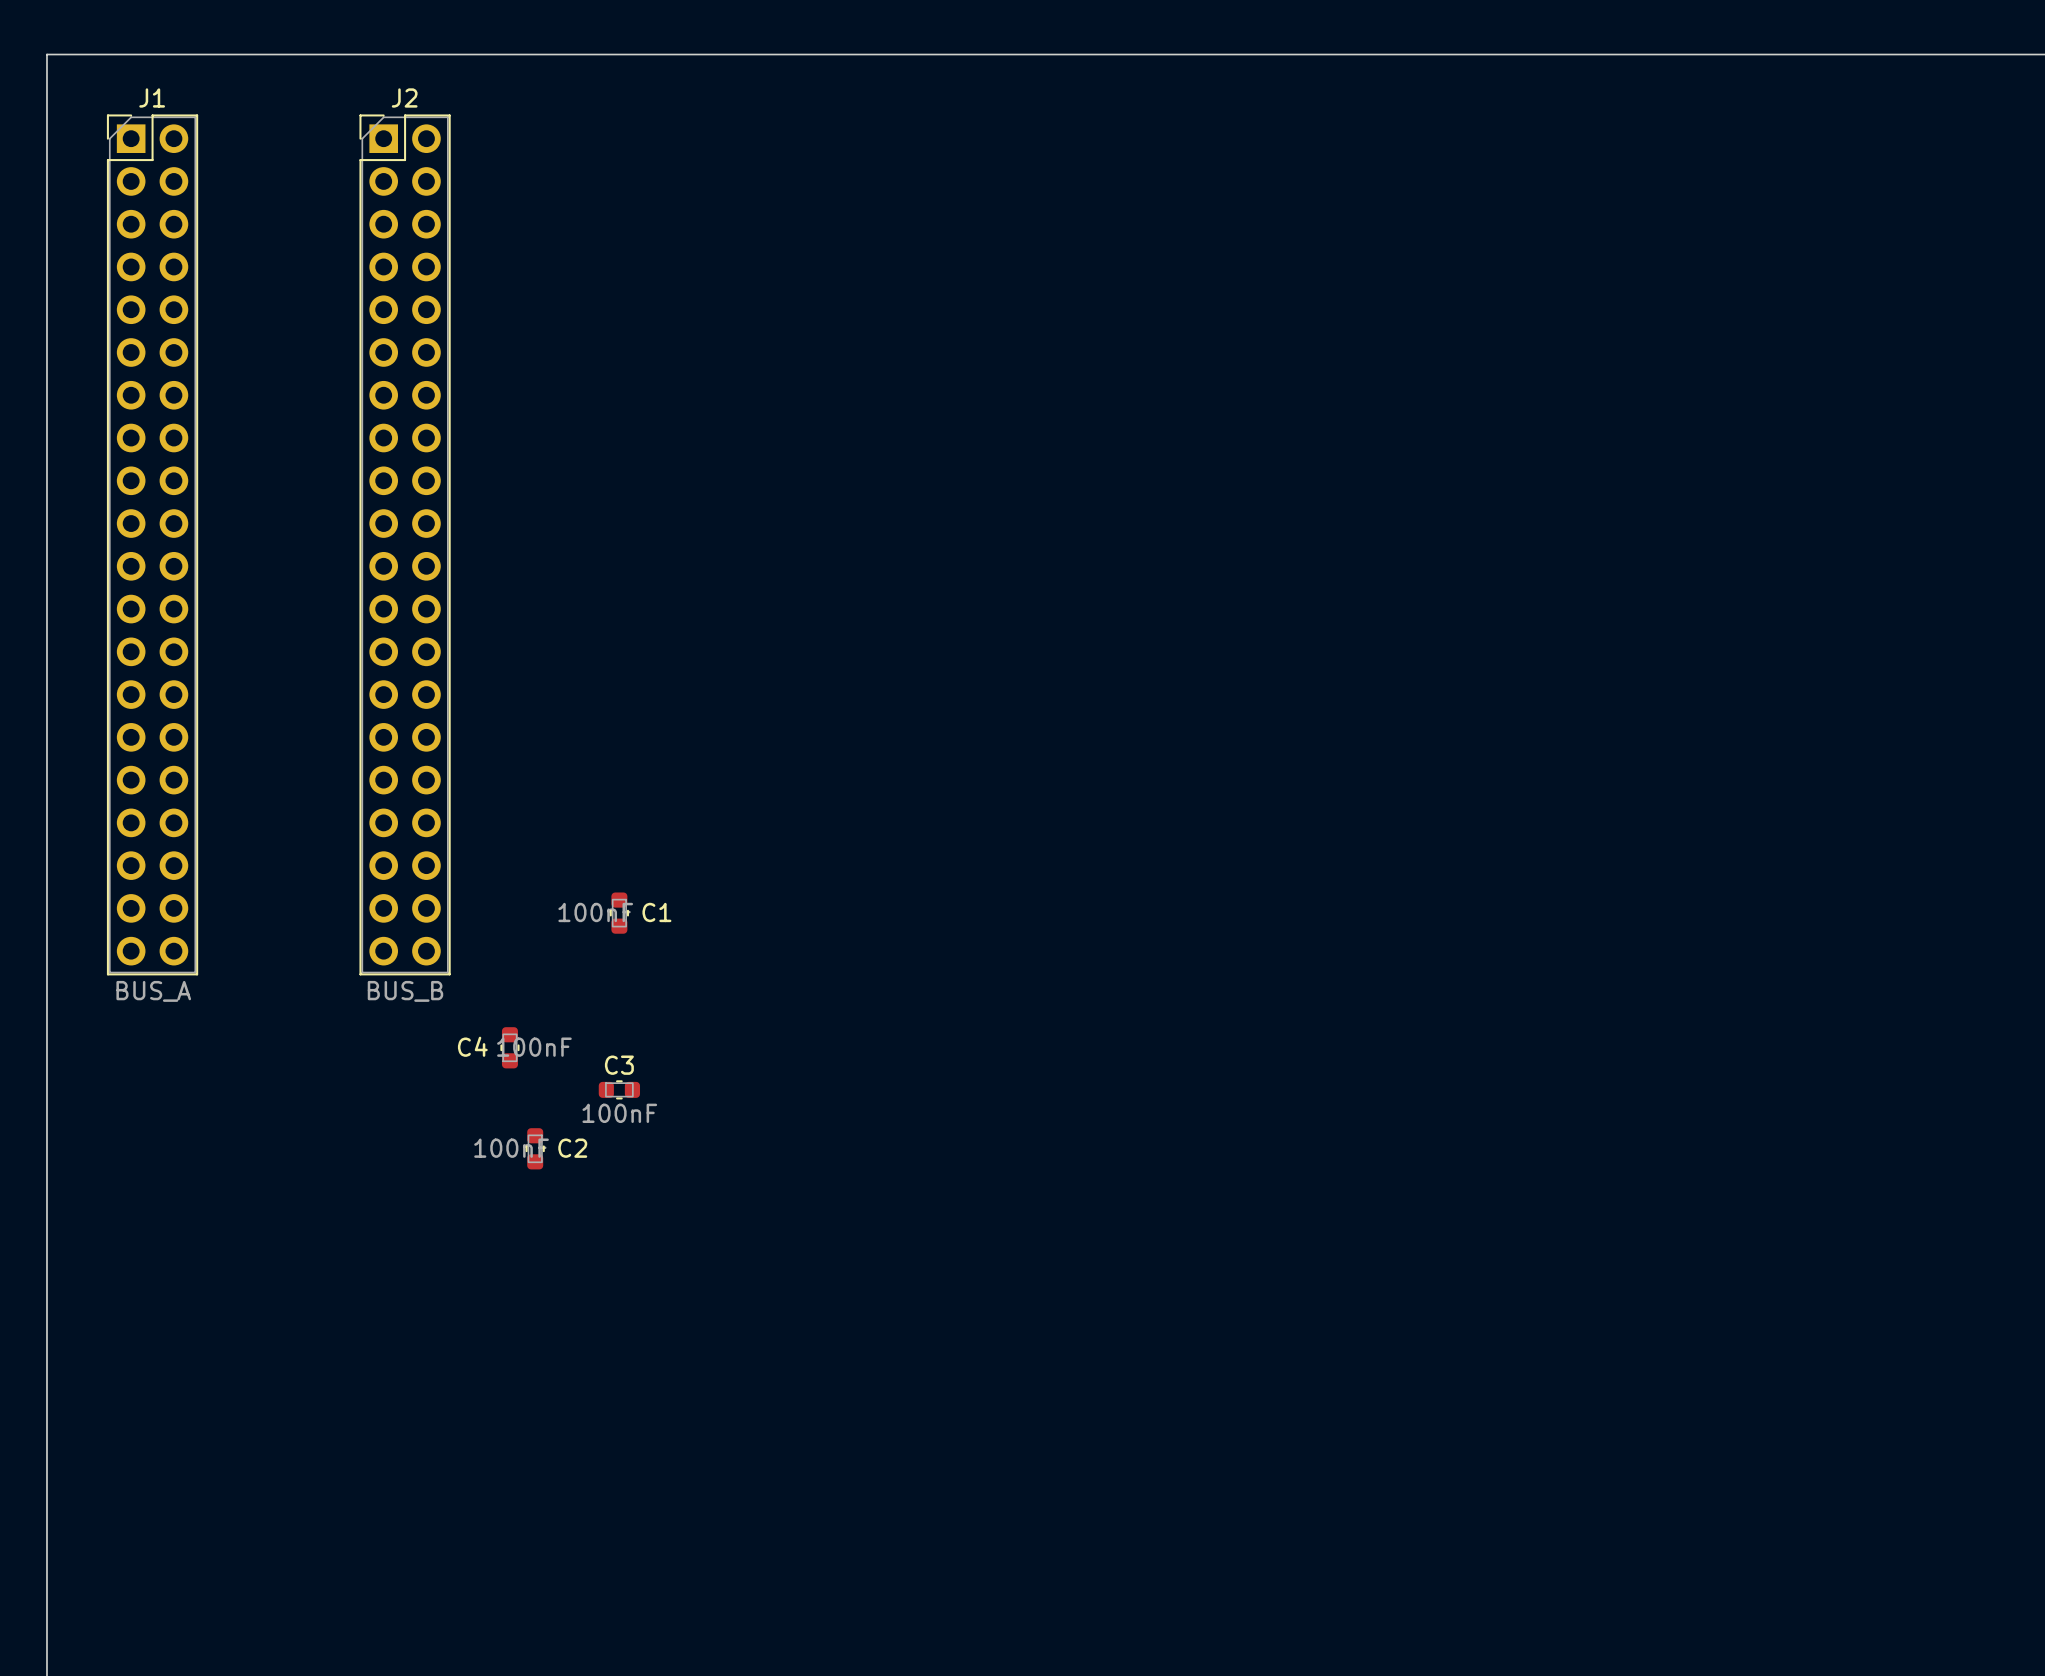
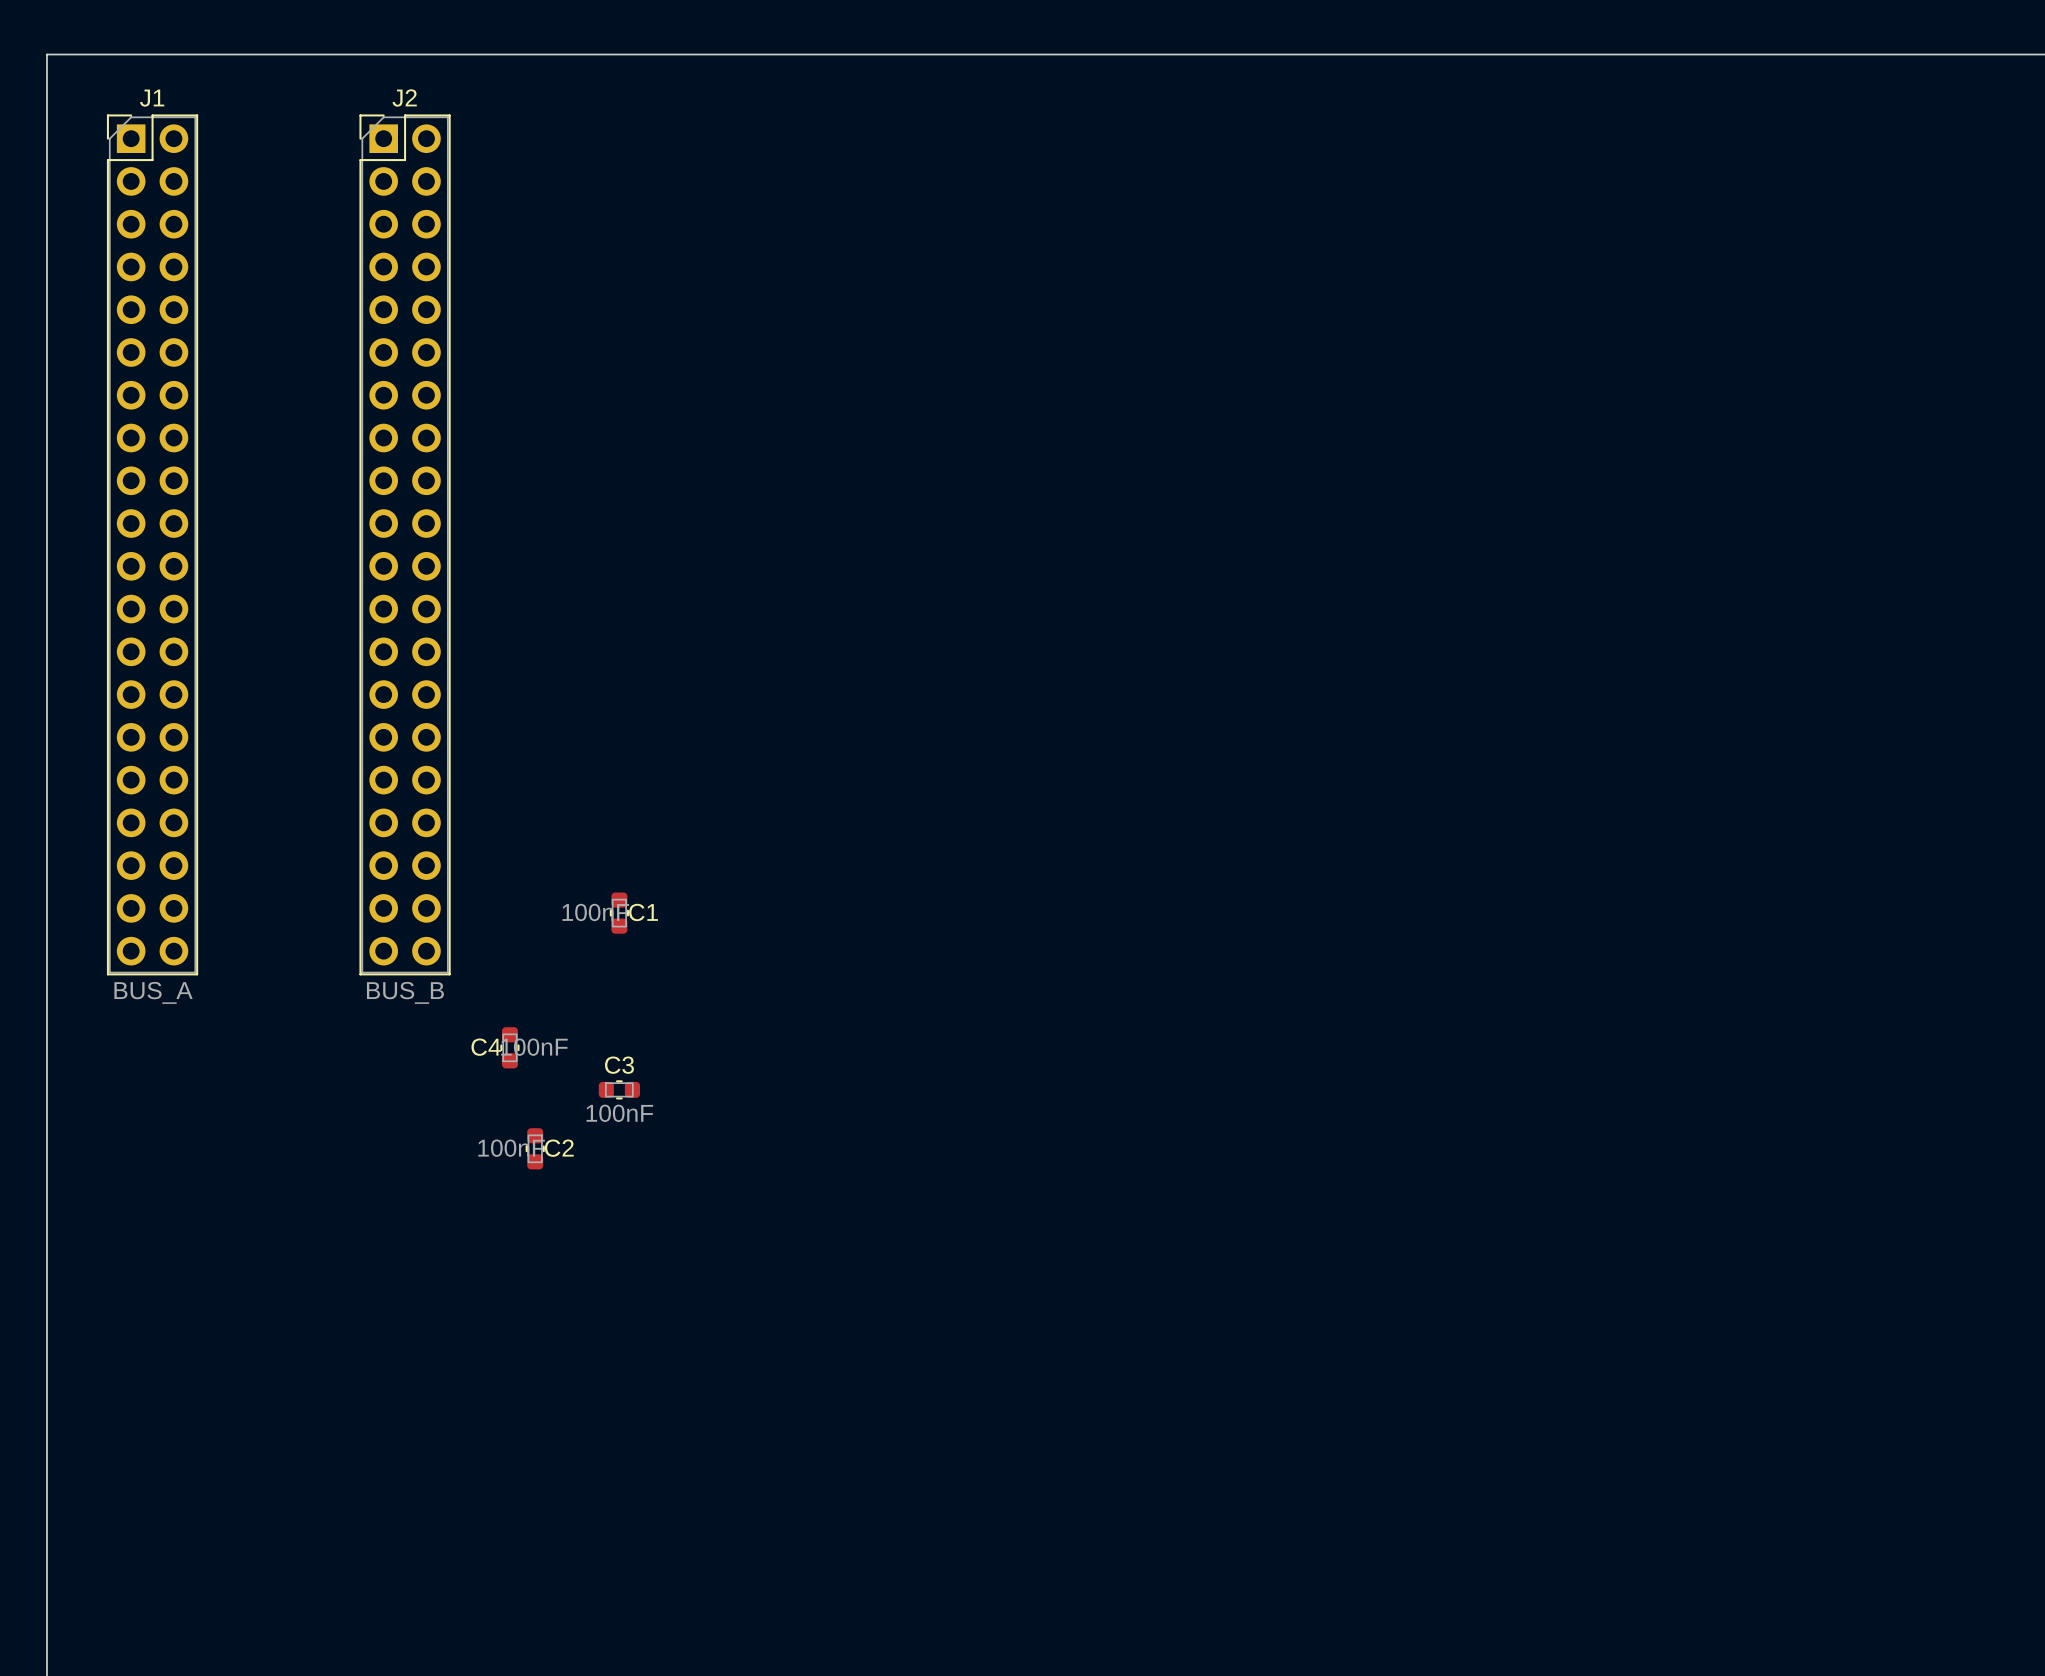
C1 name position: C1 (656, 912) -> C1 (643, 912)
C4 name position: C4 (472, 1046) -> C4 (486, 1047)
C2 name position: C2 (572, 1148) -> C2 (559, 1148)

